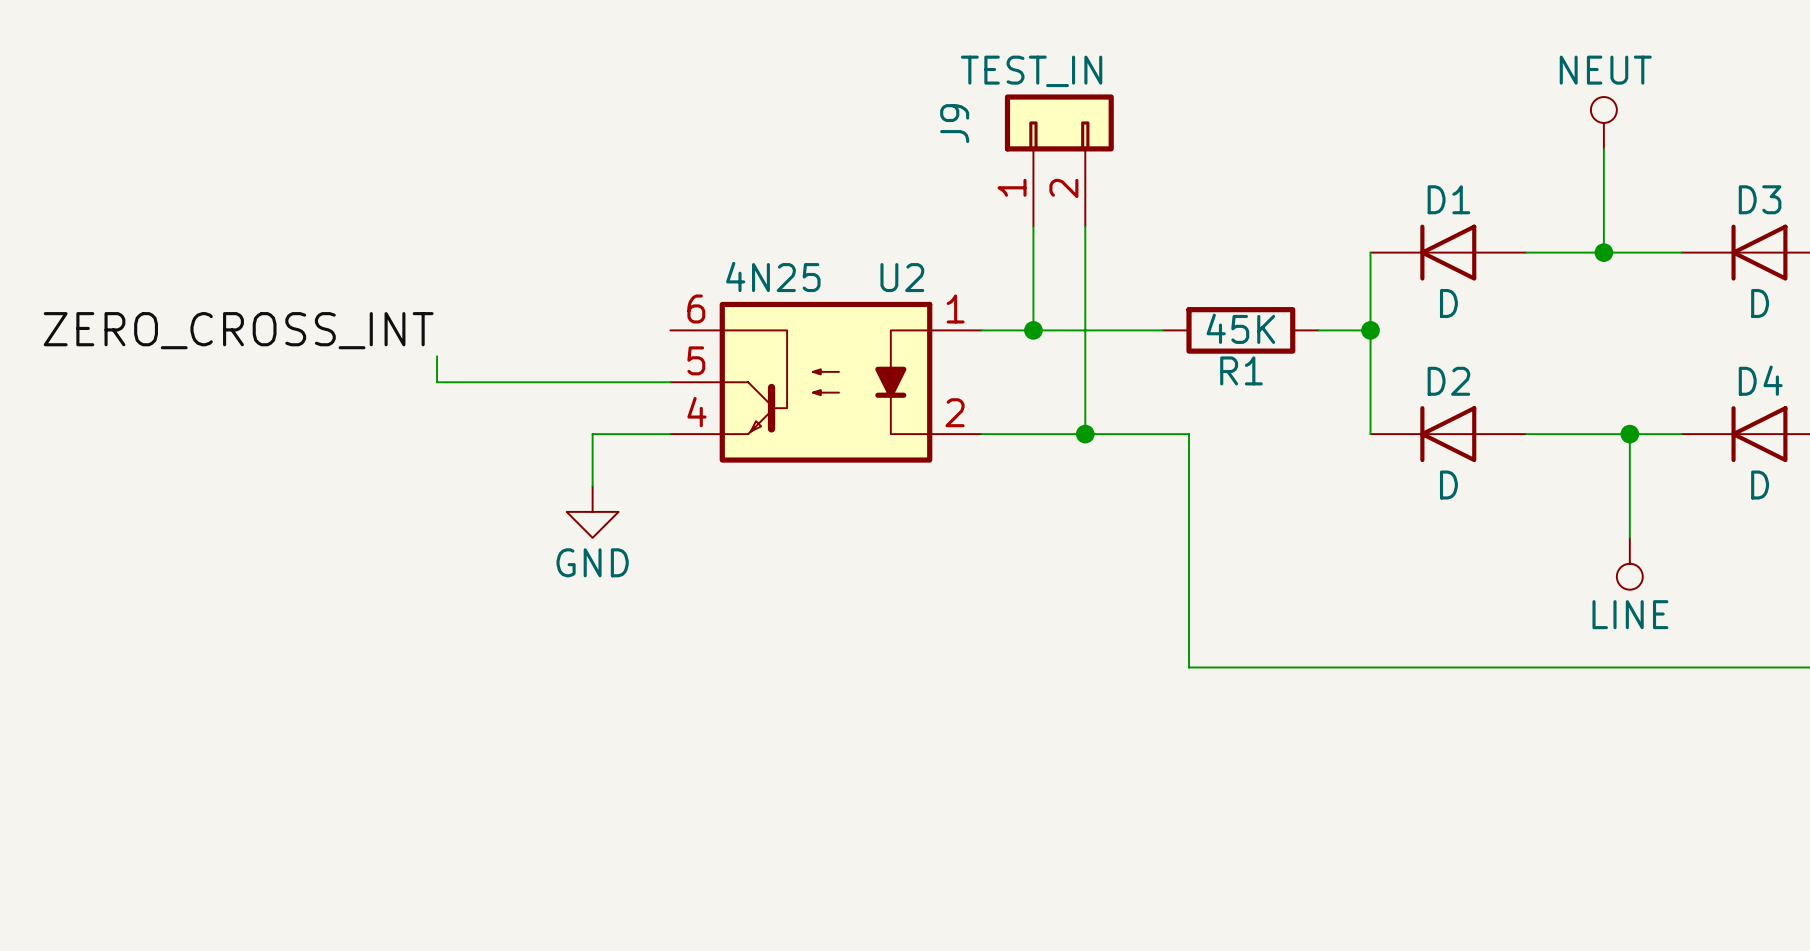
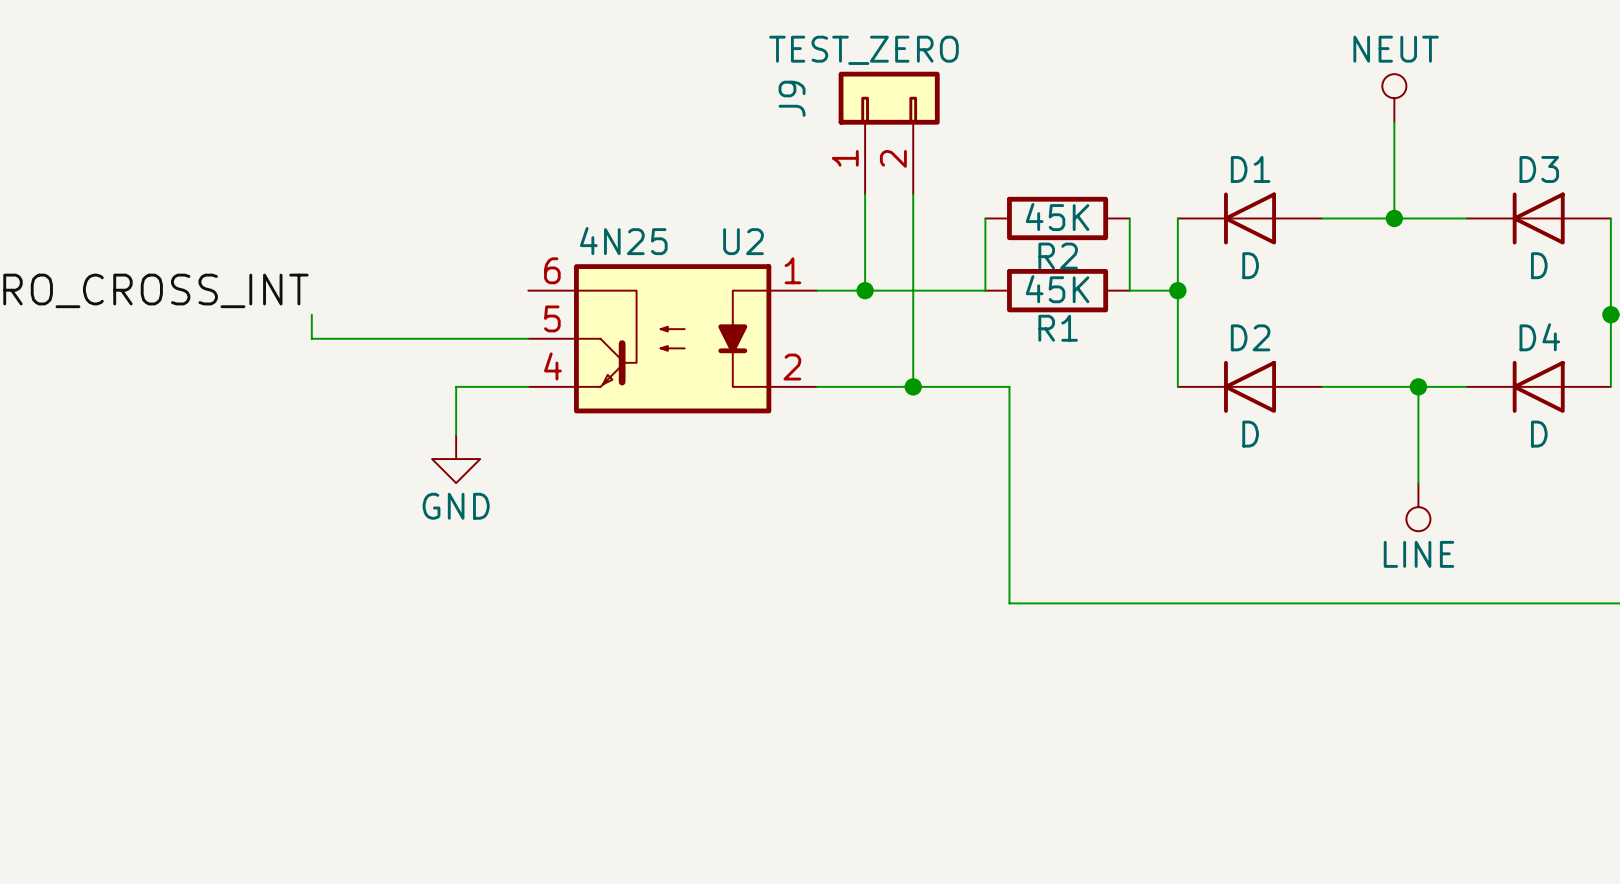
J9 value: TEST_IN (1031, 71) -> TEST_ZERO (863, 50)
wire: none -> (985, 218) (985, 290)
R2: none -> 45K (1057, 218)
wire: none -> (1129, 218) (1129, 290)

